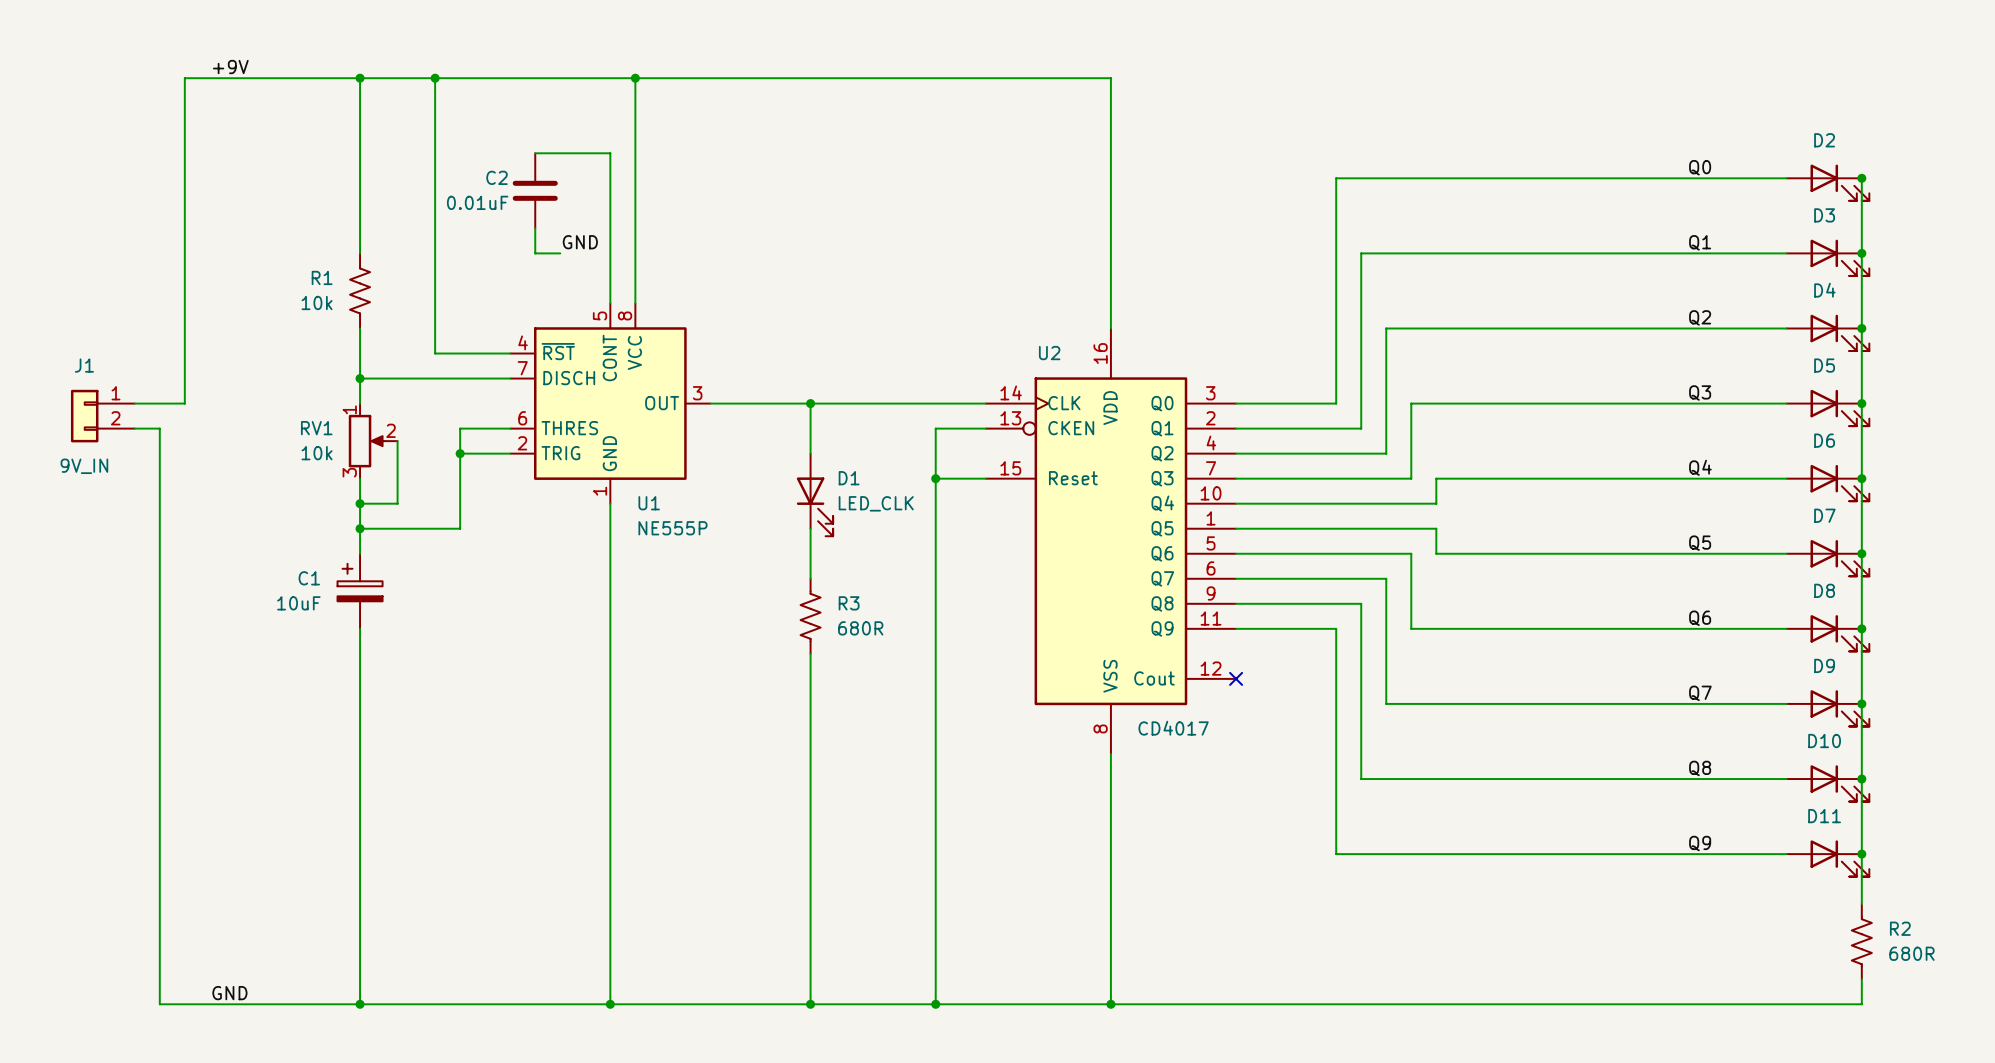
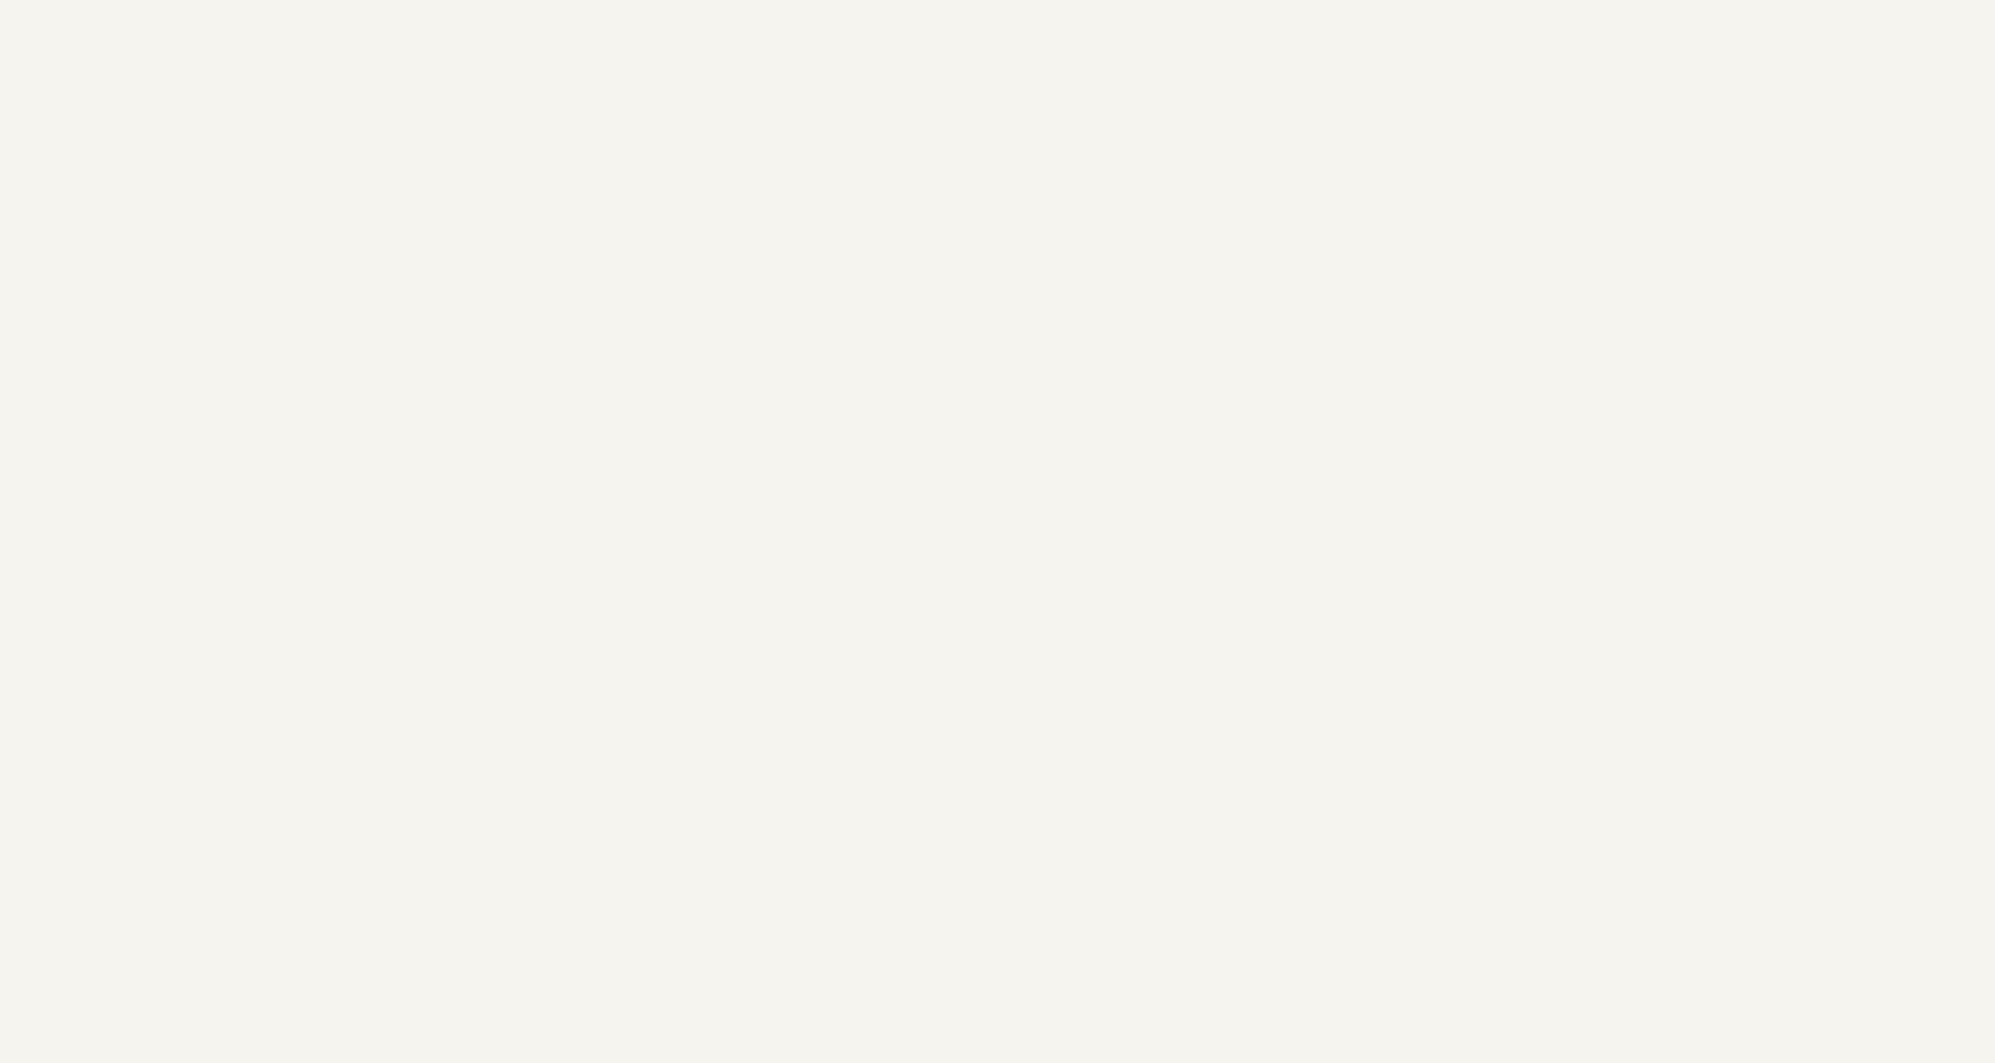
label: +9V (230, 67) -> none
wire: (360, 78) (360, 253) -> none
junction: (360, 78) -> none
wire: (435, 78) (435, 353) (510, 353) -> none
junction: (435, 78) -> none
wire: (635, 78) (635, 303) -> none
junction: (635, 78) -> none
wire: (535, 153) (610, 153) (610, 303) -> none
label: Q0 (1700, 167) -> none
wire: (1786, 178) (1336, 178) (1336, 403) (1236, 403) -> none
wire: (1861, 178) (1861, 904) -> none
junction: (1861, 178) -> none
D2: (1828, 182) -> none
C2: 0.01uF (535, 190) -> none
wire: (535, 228) (535, 253) (560, 253) -> none
label: GND (580, 242) -> none
label: Q1 (1700, 242) -> none
wire: (1786, 253) (1361, 253) (1361, 428) (1236, 428) -> none
junction: (1861, 253) -> none
D3: (1828, 257) -> none
R1: 10k (360, 290) -> none
label: Q2 (1700, 317) -> none
wire: (360, 328) (360, 403) -> none
wire: (1110, 328) (1110, 78) (184, 78) (184, 403) (134, 403) -> none
wire: (1786, 328) (1386, 328) (1386, 453) (1236, 453) -> none
junction: (1861, 328) -> none
D4: (1828, 332) -> none
wire: (360, 378) (510, 378) -> none
junction: (360, 378) -> none
label: Q3 (1700, 393) -> none
U1: NE555P (610, 403) -> none
wire: (710, 403) (985, 403) -> none
wire: (810, 403) (810, 453) -> none
junction: (810, 403) -> none
wire: (1786, 403) (1411, 403) (1411, 478) (1236, 478) -> none
junction: (1861, 403) -> none
D5: (1828, 407) -> none
J1: 9V_IN (102, 416) -> none
wire: (134, 428) (159, 428) (159, 1004) (1861, 1004) (1861, 979) -> none
wire: (510, 428) (460, 428) (460, 528) (360, 528) -> none
wire: (985, 428) (935, 428) (935, 1004) -> none
RV1: 10k (373, 441) -> none
wire: (397, 441) (397, 503) (360, 503) -> none
wire: (460, 453) (510, 453) -> none
junction: (460, 453) -> none
label: Q4 (1700, 467) -> none
wire: (360, 478) (360, 553) -> none
wire: (935, 478) (985, 478) -> none
junction: (935, 478) -> none
wire: (1786, 478) (1436, 478) (1436, 503) (1236, 503) -> none
junction: (1861, 478) -> none
D6: (1828, 483) -> none
D1: LED_CLK (814, 494) -> none
junction: (360, 503) -> none
wire: (610, 503) (610, 1004) -> none
junction: (360, 528) -> none
wire: (810, 528) (810, 578) -> none
wire: (1236, 528) (1436, 528) (1436, 553) (1786, 553) -> none
U2: CD4017 (1110, 541) -> none
label: Q5 (1700, 543) -> none
wire: (1236, 553) (1411, 553) (1411, 628) (1786, 628) -> none
junction: (1861, 553) -> none
D7: (1828, 558) -> none
wire: (1236, 578) (1386, 578) (1386, 703) (1786, 703) -> none
C1: 10uF (360, 591) -> none
wire: (1236, 603) (1361, 603) (1361, 779) (1786, 779) -> none
R3: 680R (810, 616) -> none
label: Q6 (1700, 618) -> none
wire: (360, 628) (360, 1004) -> none
wire: (1236, 628) (1336, 628) (1336, 854) (1786, 854) -> none
junction: (1861, 628) -> none
D8: (1828, 633) -> none
wire: (810, 653) (810, 1004) -> none
no-connect mark: (1236, 678) -> none
label: Q7 (1700, 693) -> none
junction: (1861, 703) -> none
D9: (1828, 708) -> none
wire: (1110, 753) (1110, 1004) -> none
label: Q8 (1700, 768) -> none
junction: (1861, 779) -> none
D10: (1828, 783) -> none
label: Q9 (1700, 843) -> none
junction: (1861, 854) -> none
D11: (1828, 858) -> none
R2: 680R (1861, 941) -> none
label: GND (229, 993) -> none
junction: (360, 1004) -> none
junction: (610, 1004) -> none
junction: (810, 1004) -> none
junction: (935, 1004) -> none
junction: (1110, 1004) -> none

